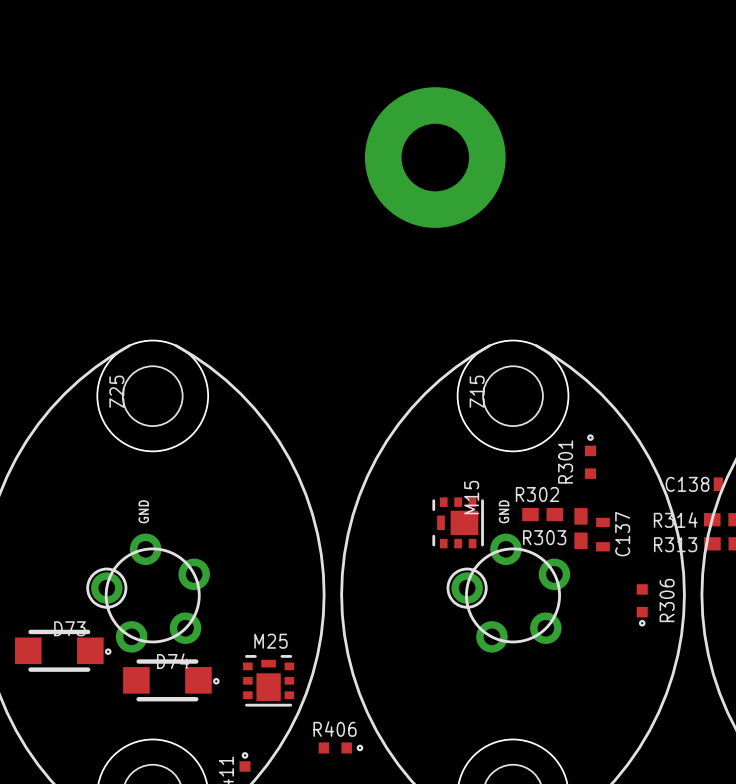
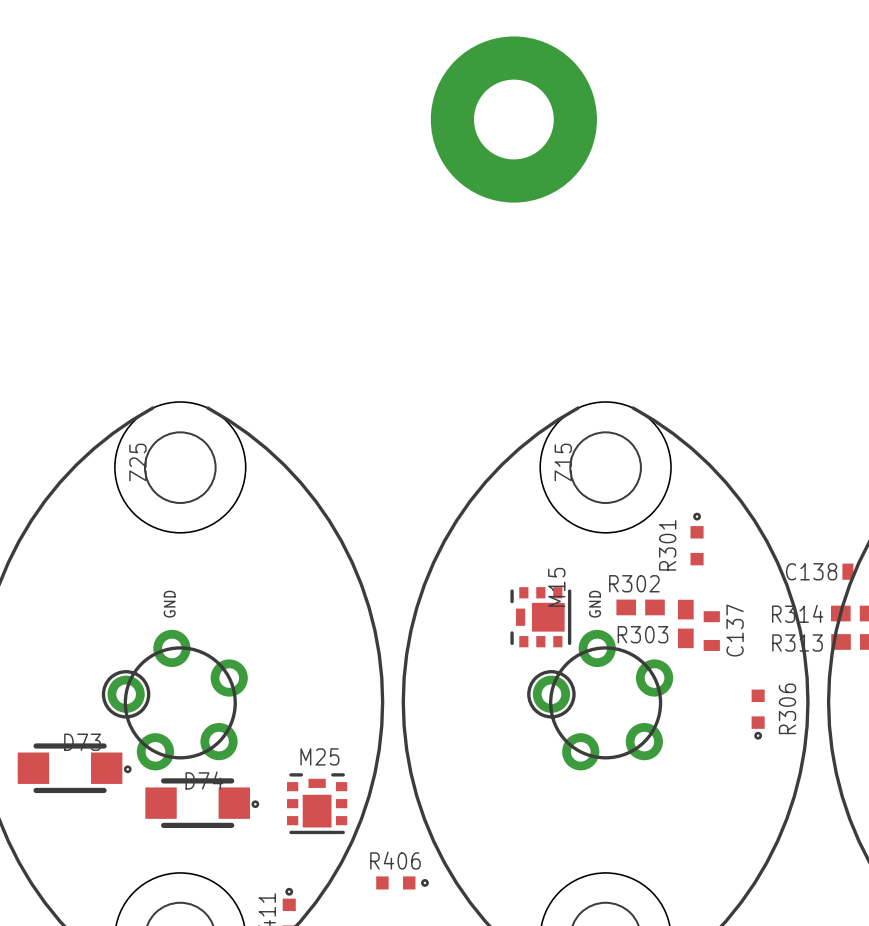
part position: (435, 157) -> (513, 119)

